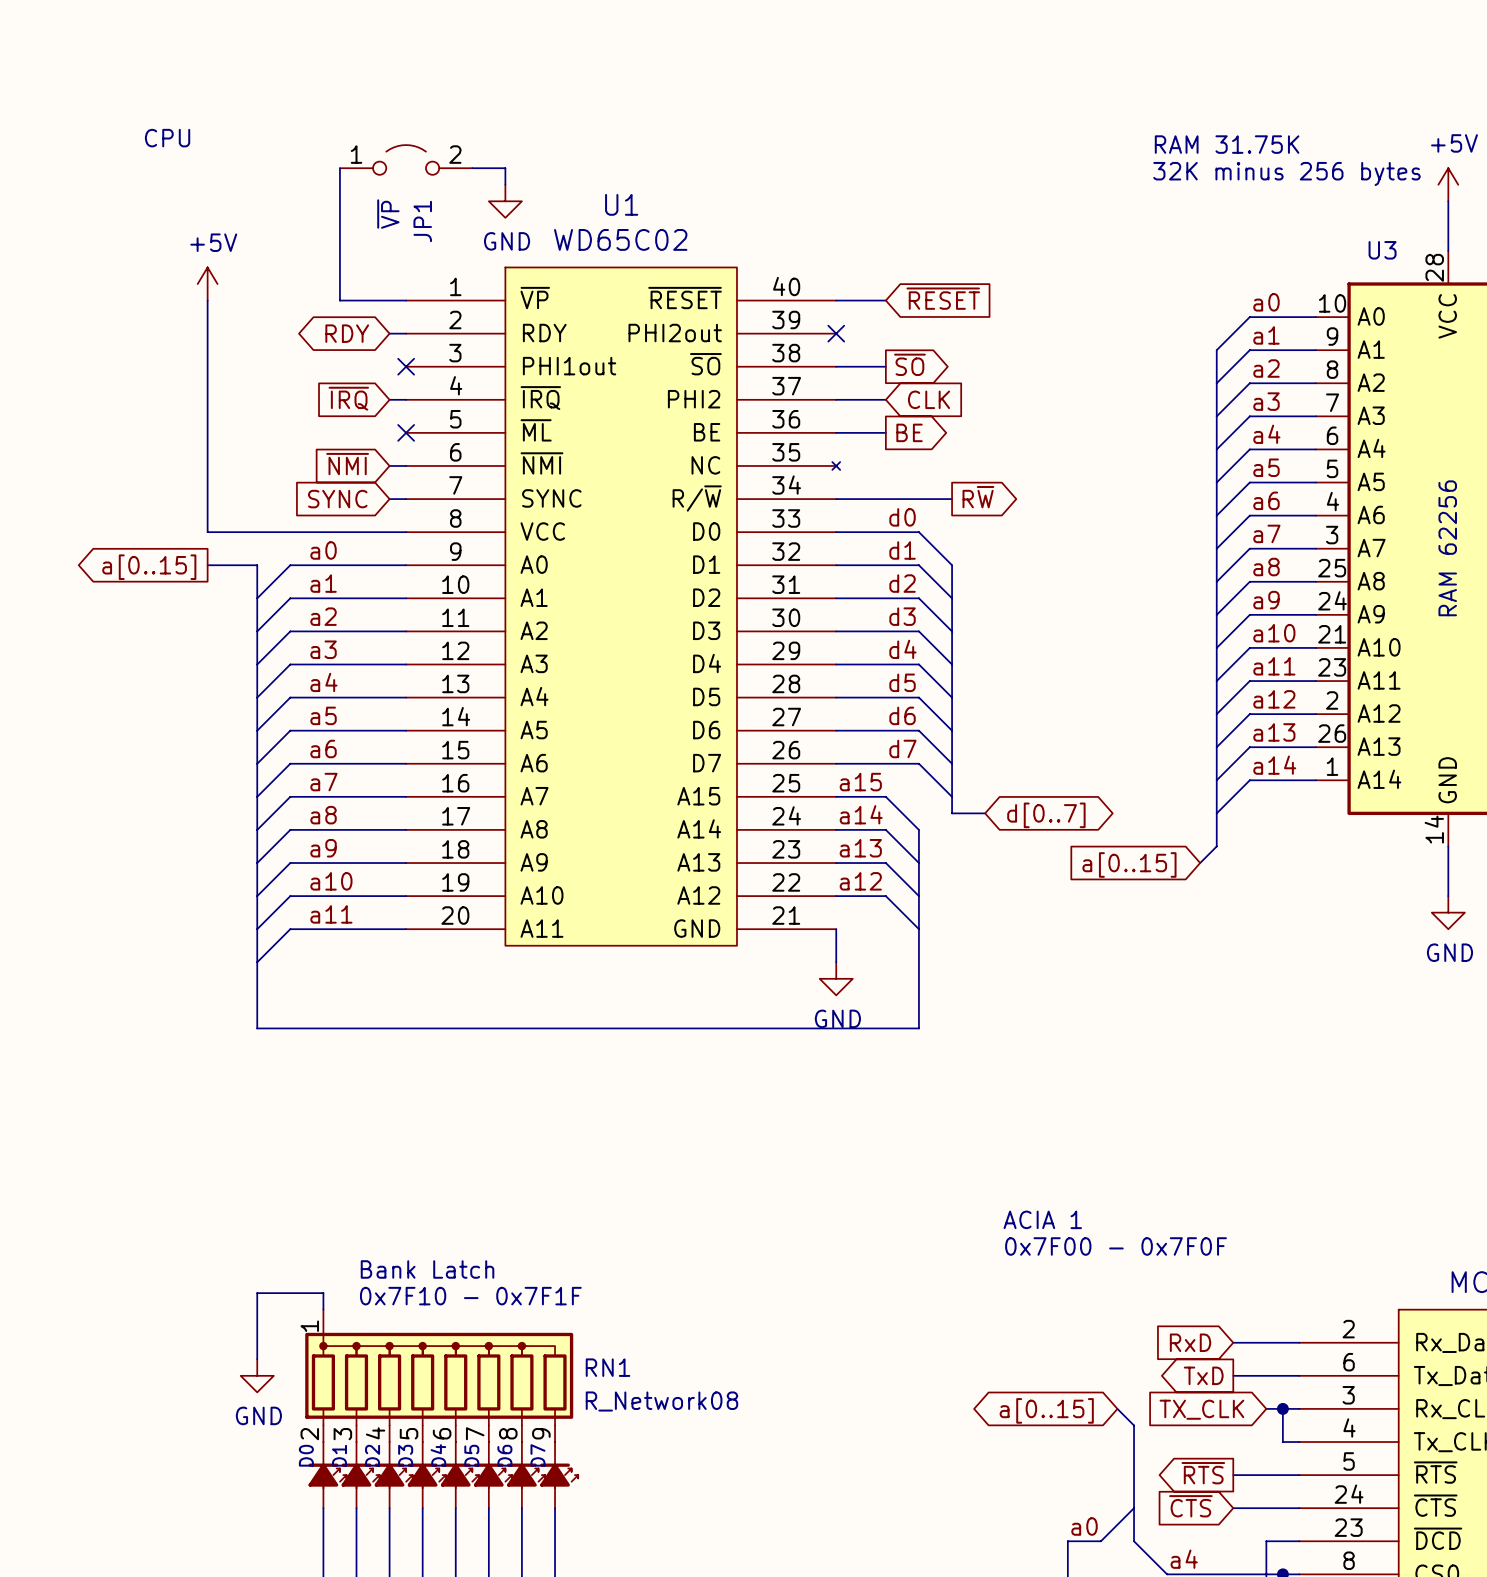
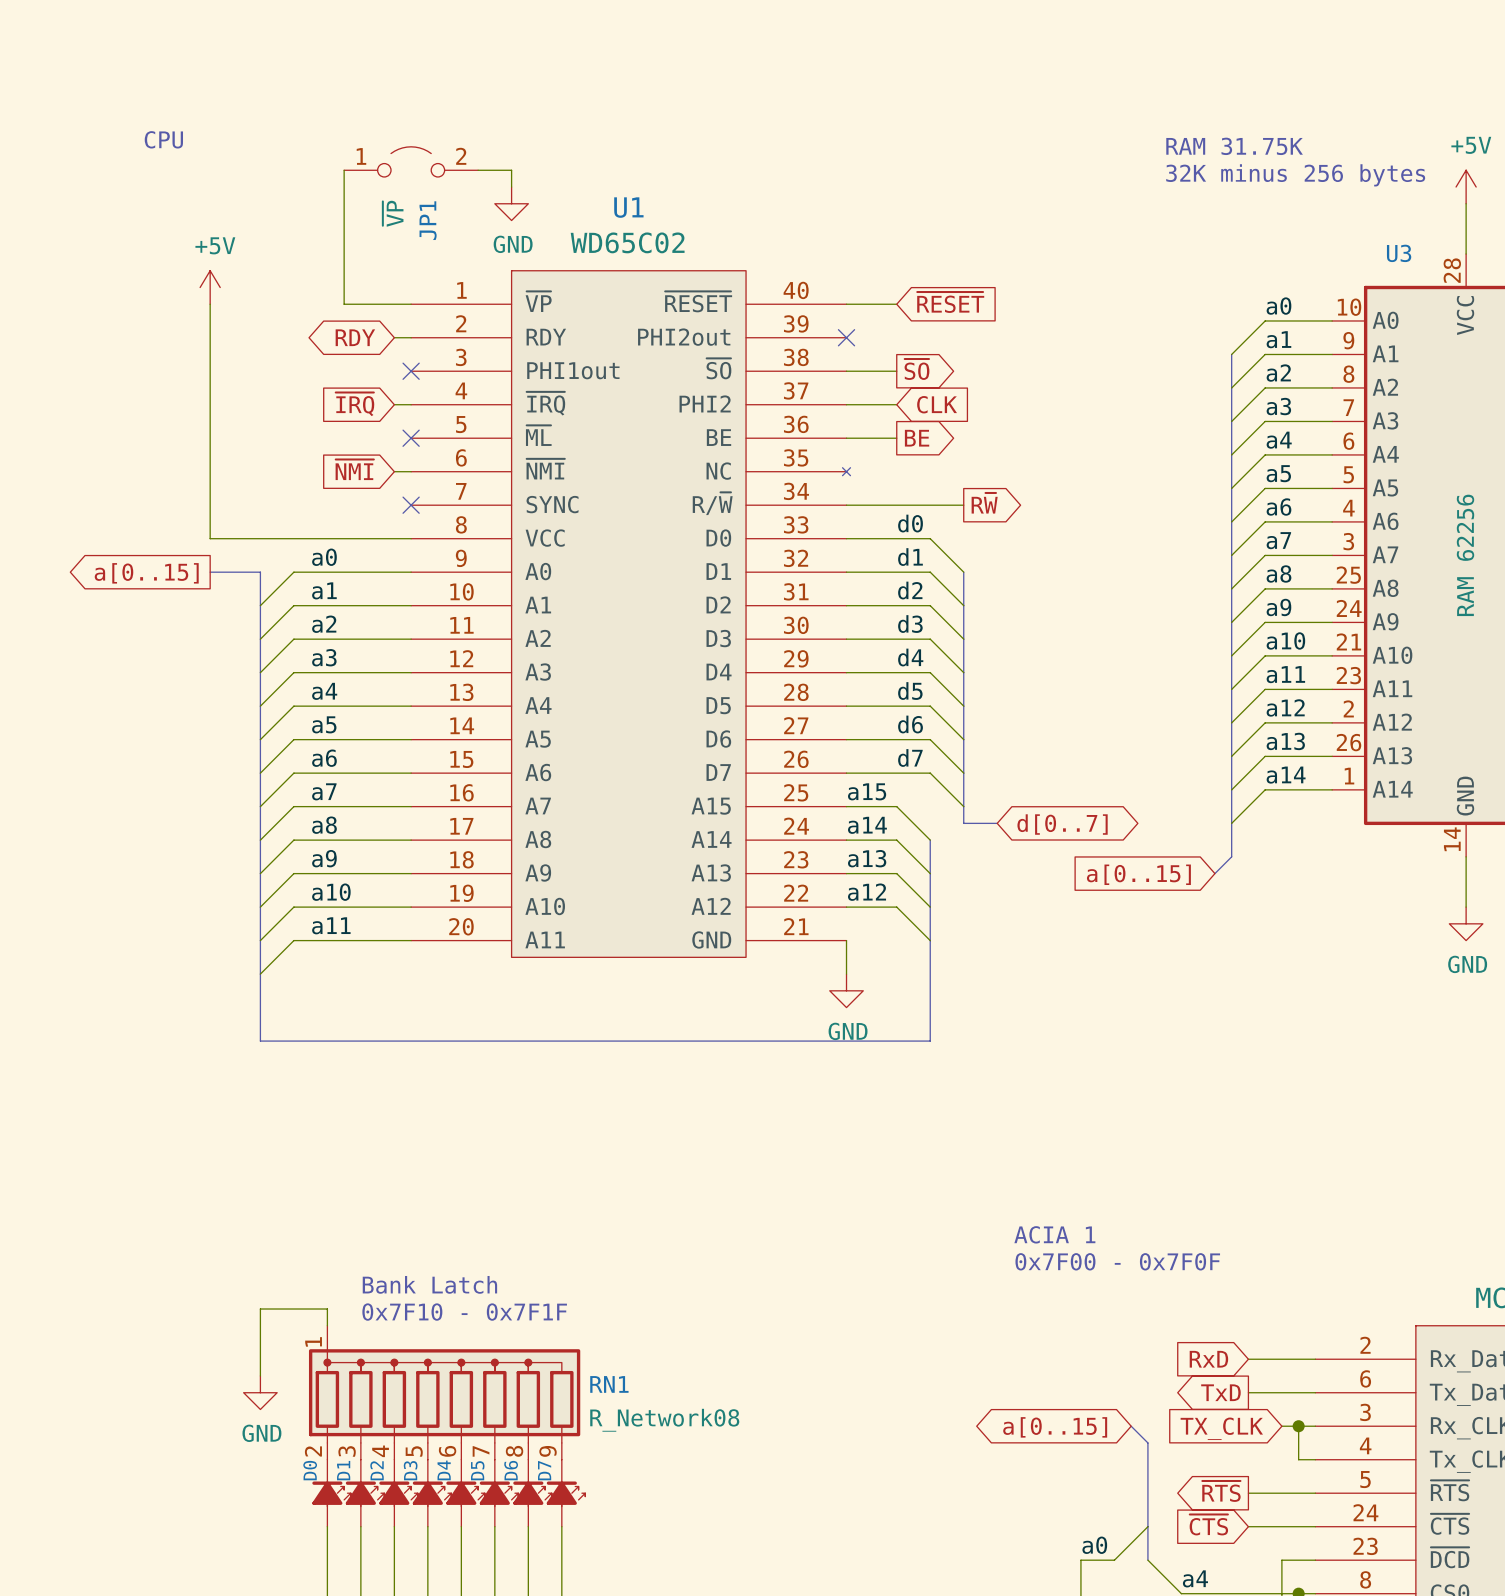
global label: SYNC (337, 499) -> none
wire: (389, 499) (406, 499) -> none
no-connect mark: none -> (411, 505)

